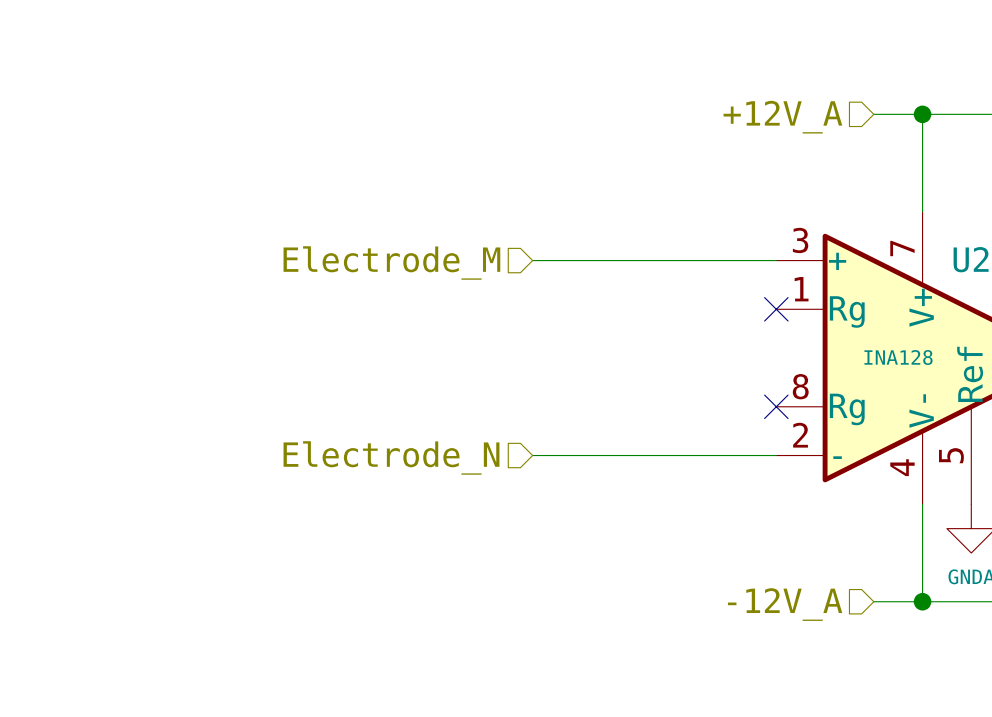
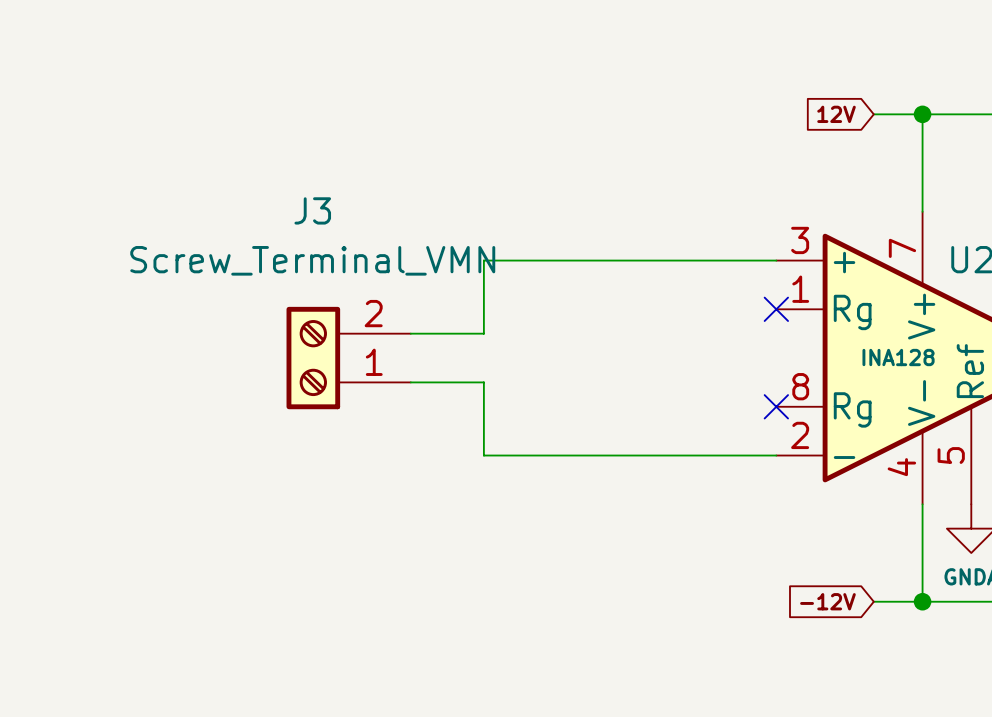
global label: none -> 12V (836, 114)
hierarchical label: +12V_A (782, 117) -> none
wire: none -> (532, 260) (483, 260) (483, 333) (410, 333)
hierarchical label: Electrode_M (391, 262) -> none
J3: none -> Screw_Terminal_VMN (348, 358)
wire: none -> (410, 382) (483, 382) (483, 455) (532, 455)
hierarchical label: Electrode_N (391, 457) -> none
global label: none -> -12V (827, 601)
hierarchical label: -12V_A (785, 604) -> none

